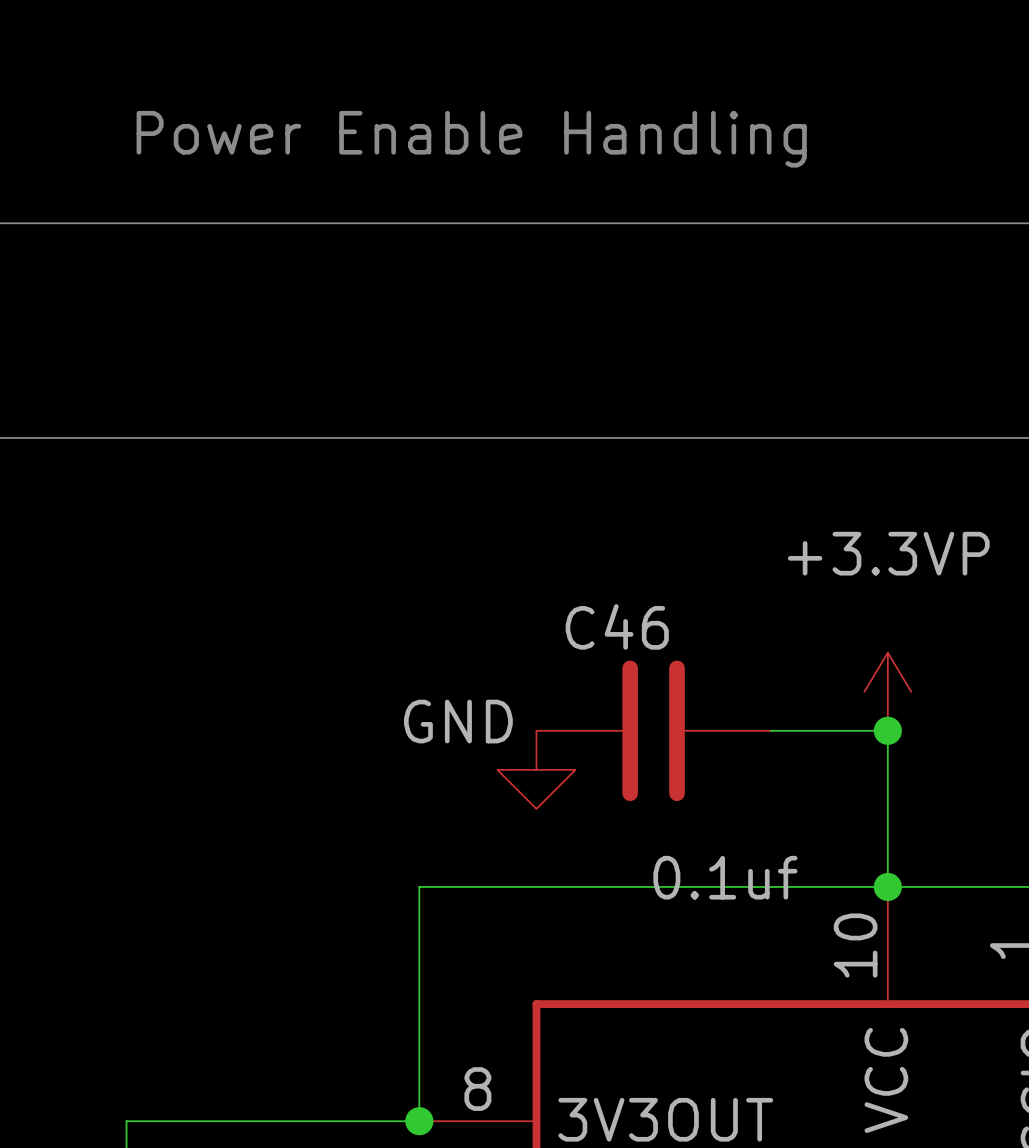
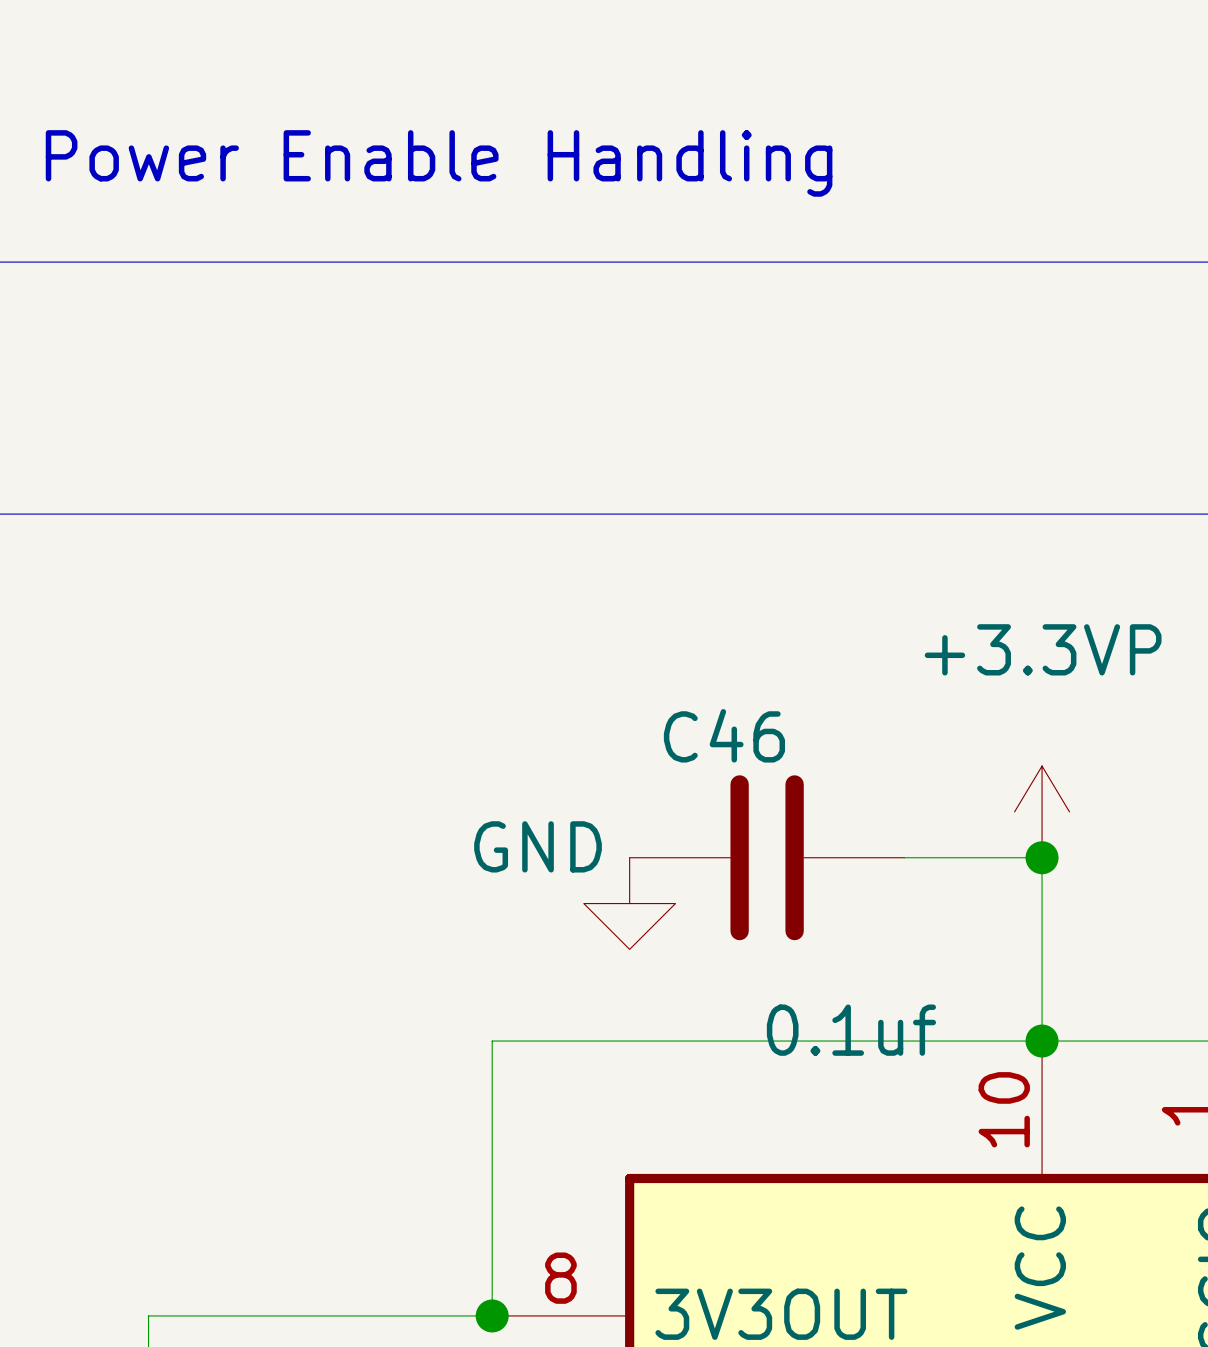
text position: Power Enable Handling (471, 139) -> Power Enable Handling (439, 163)

